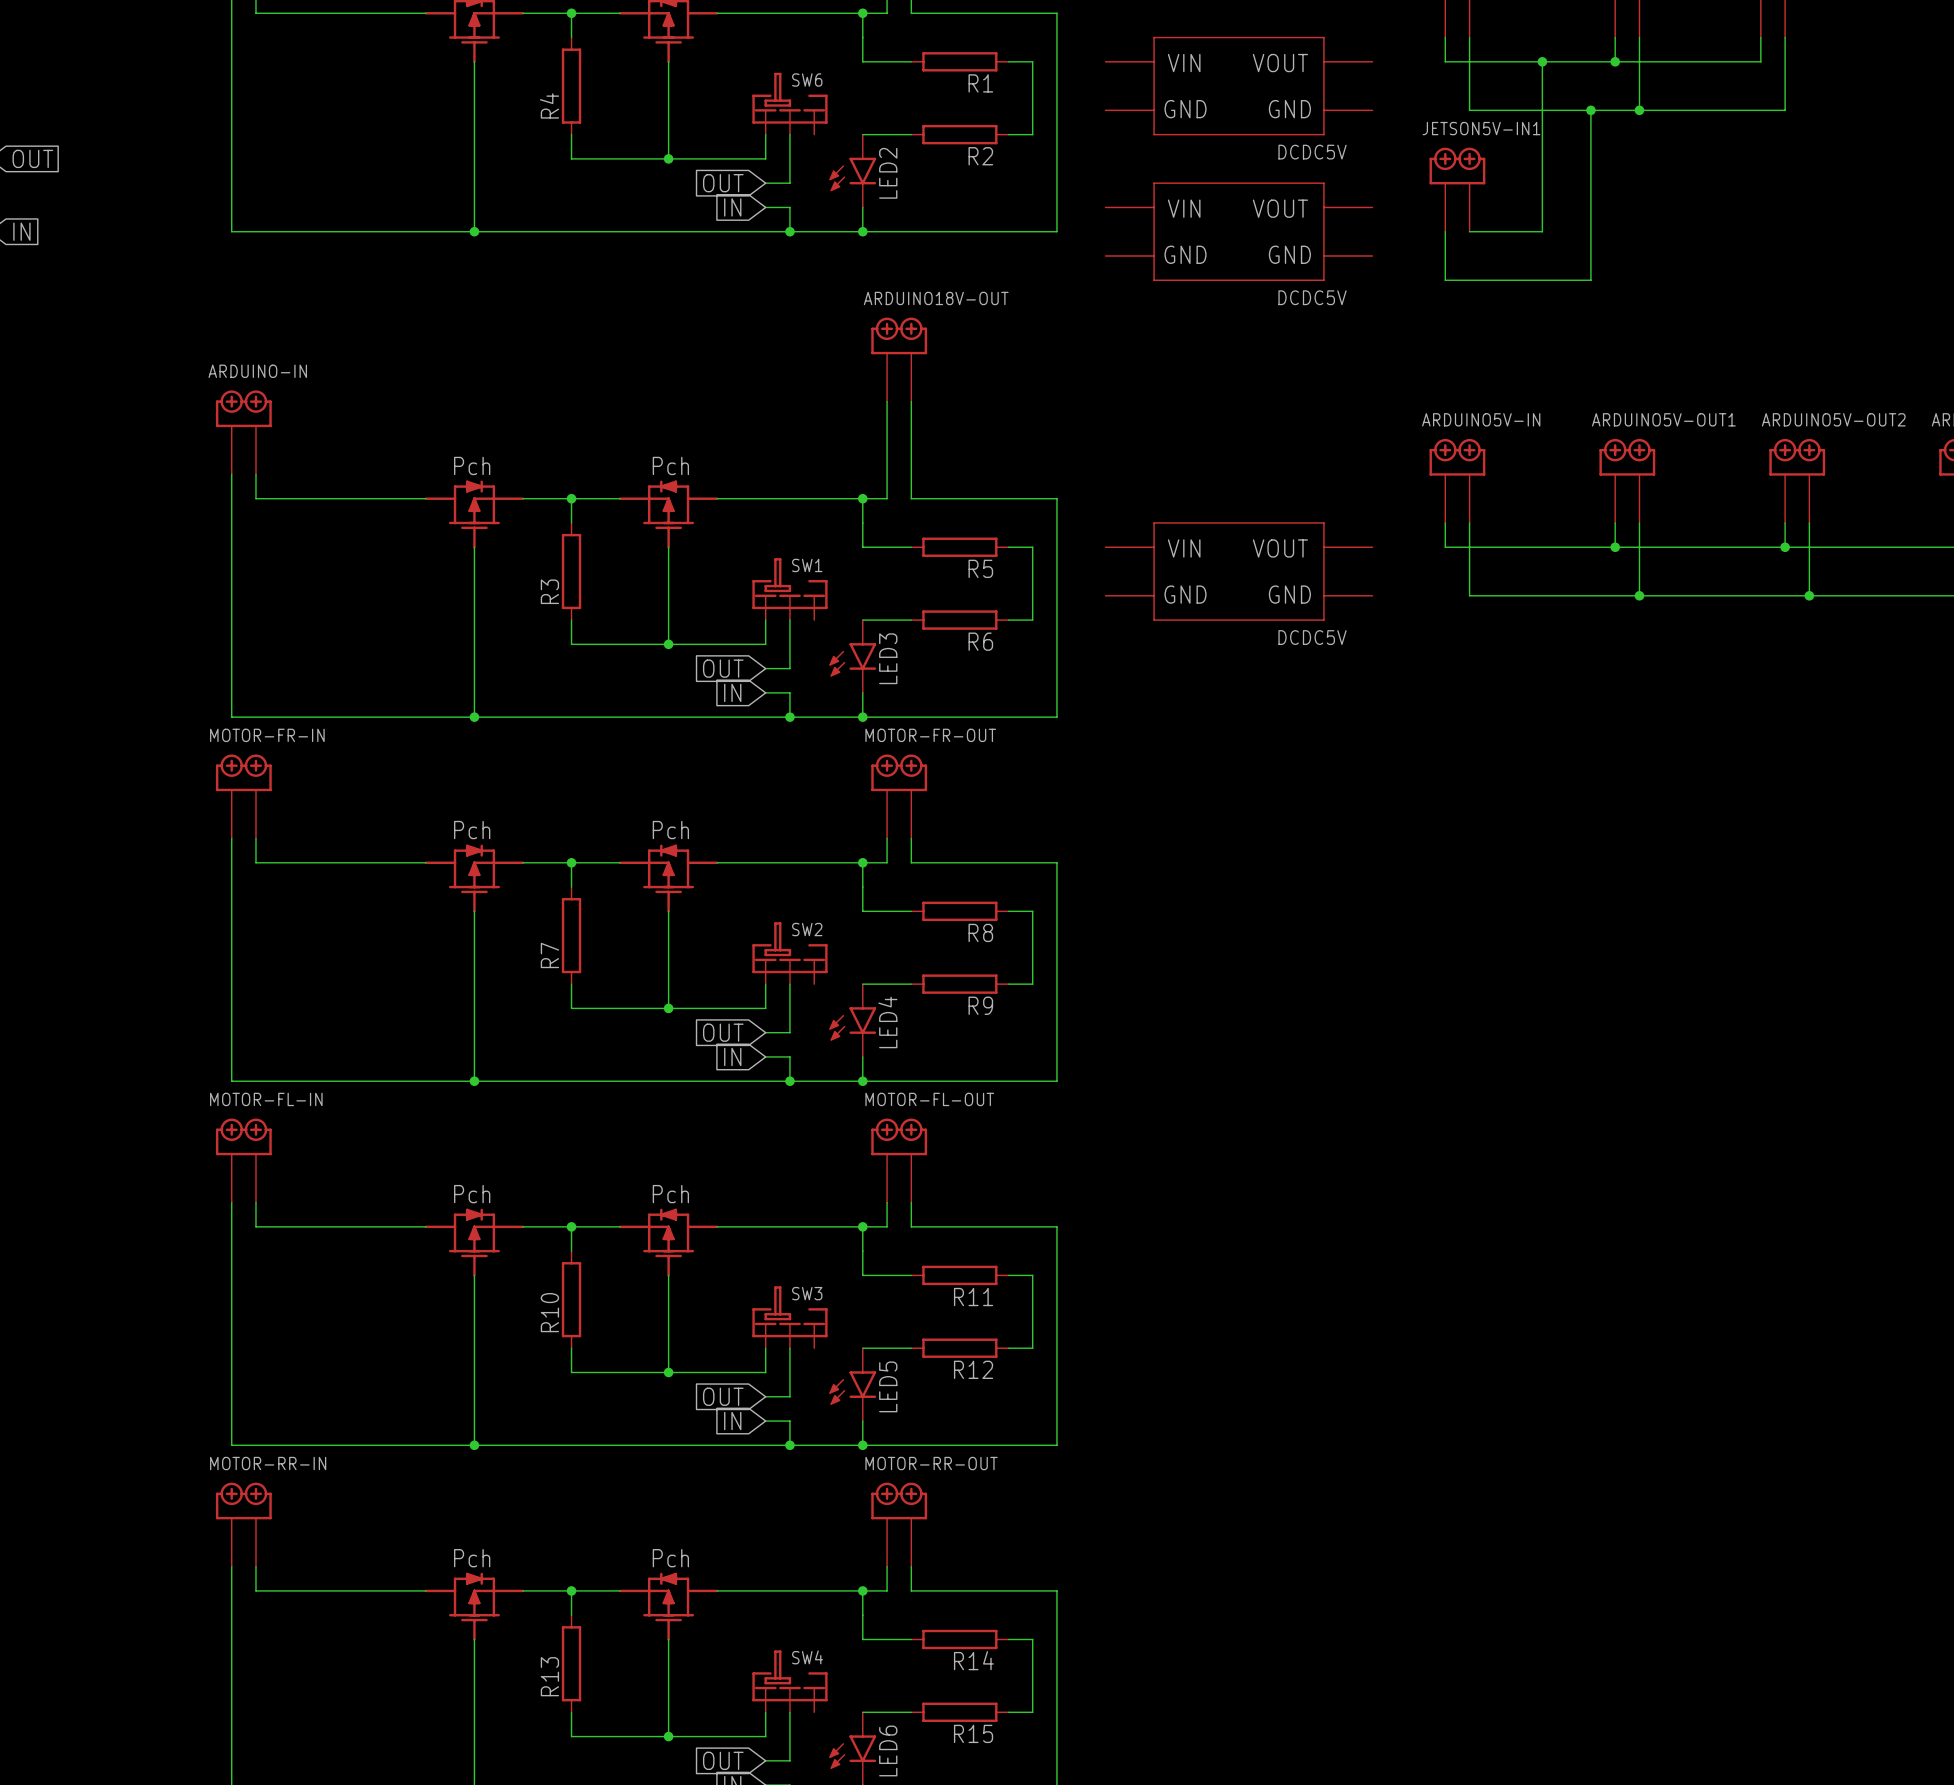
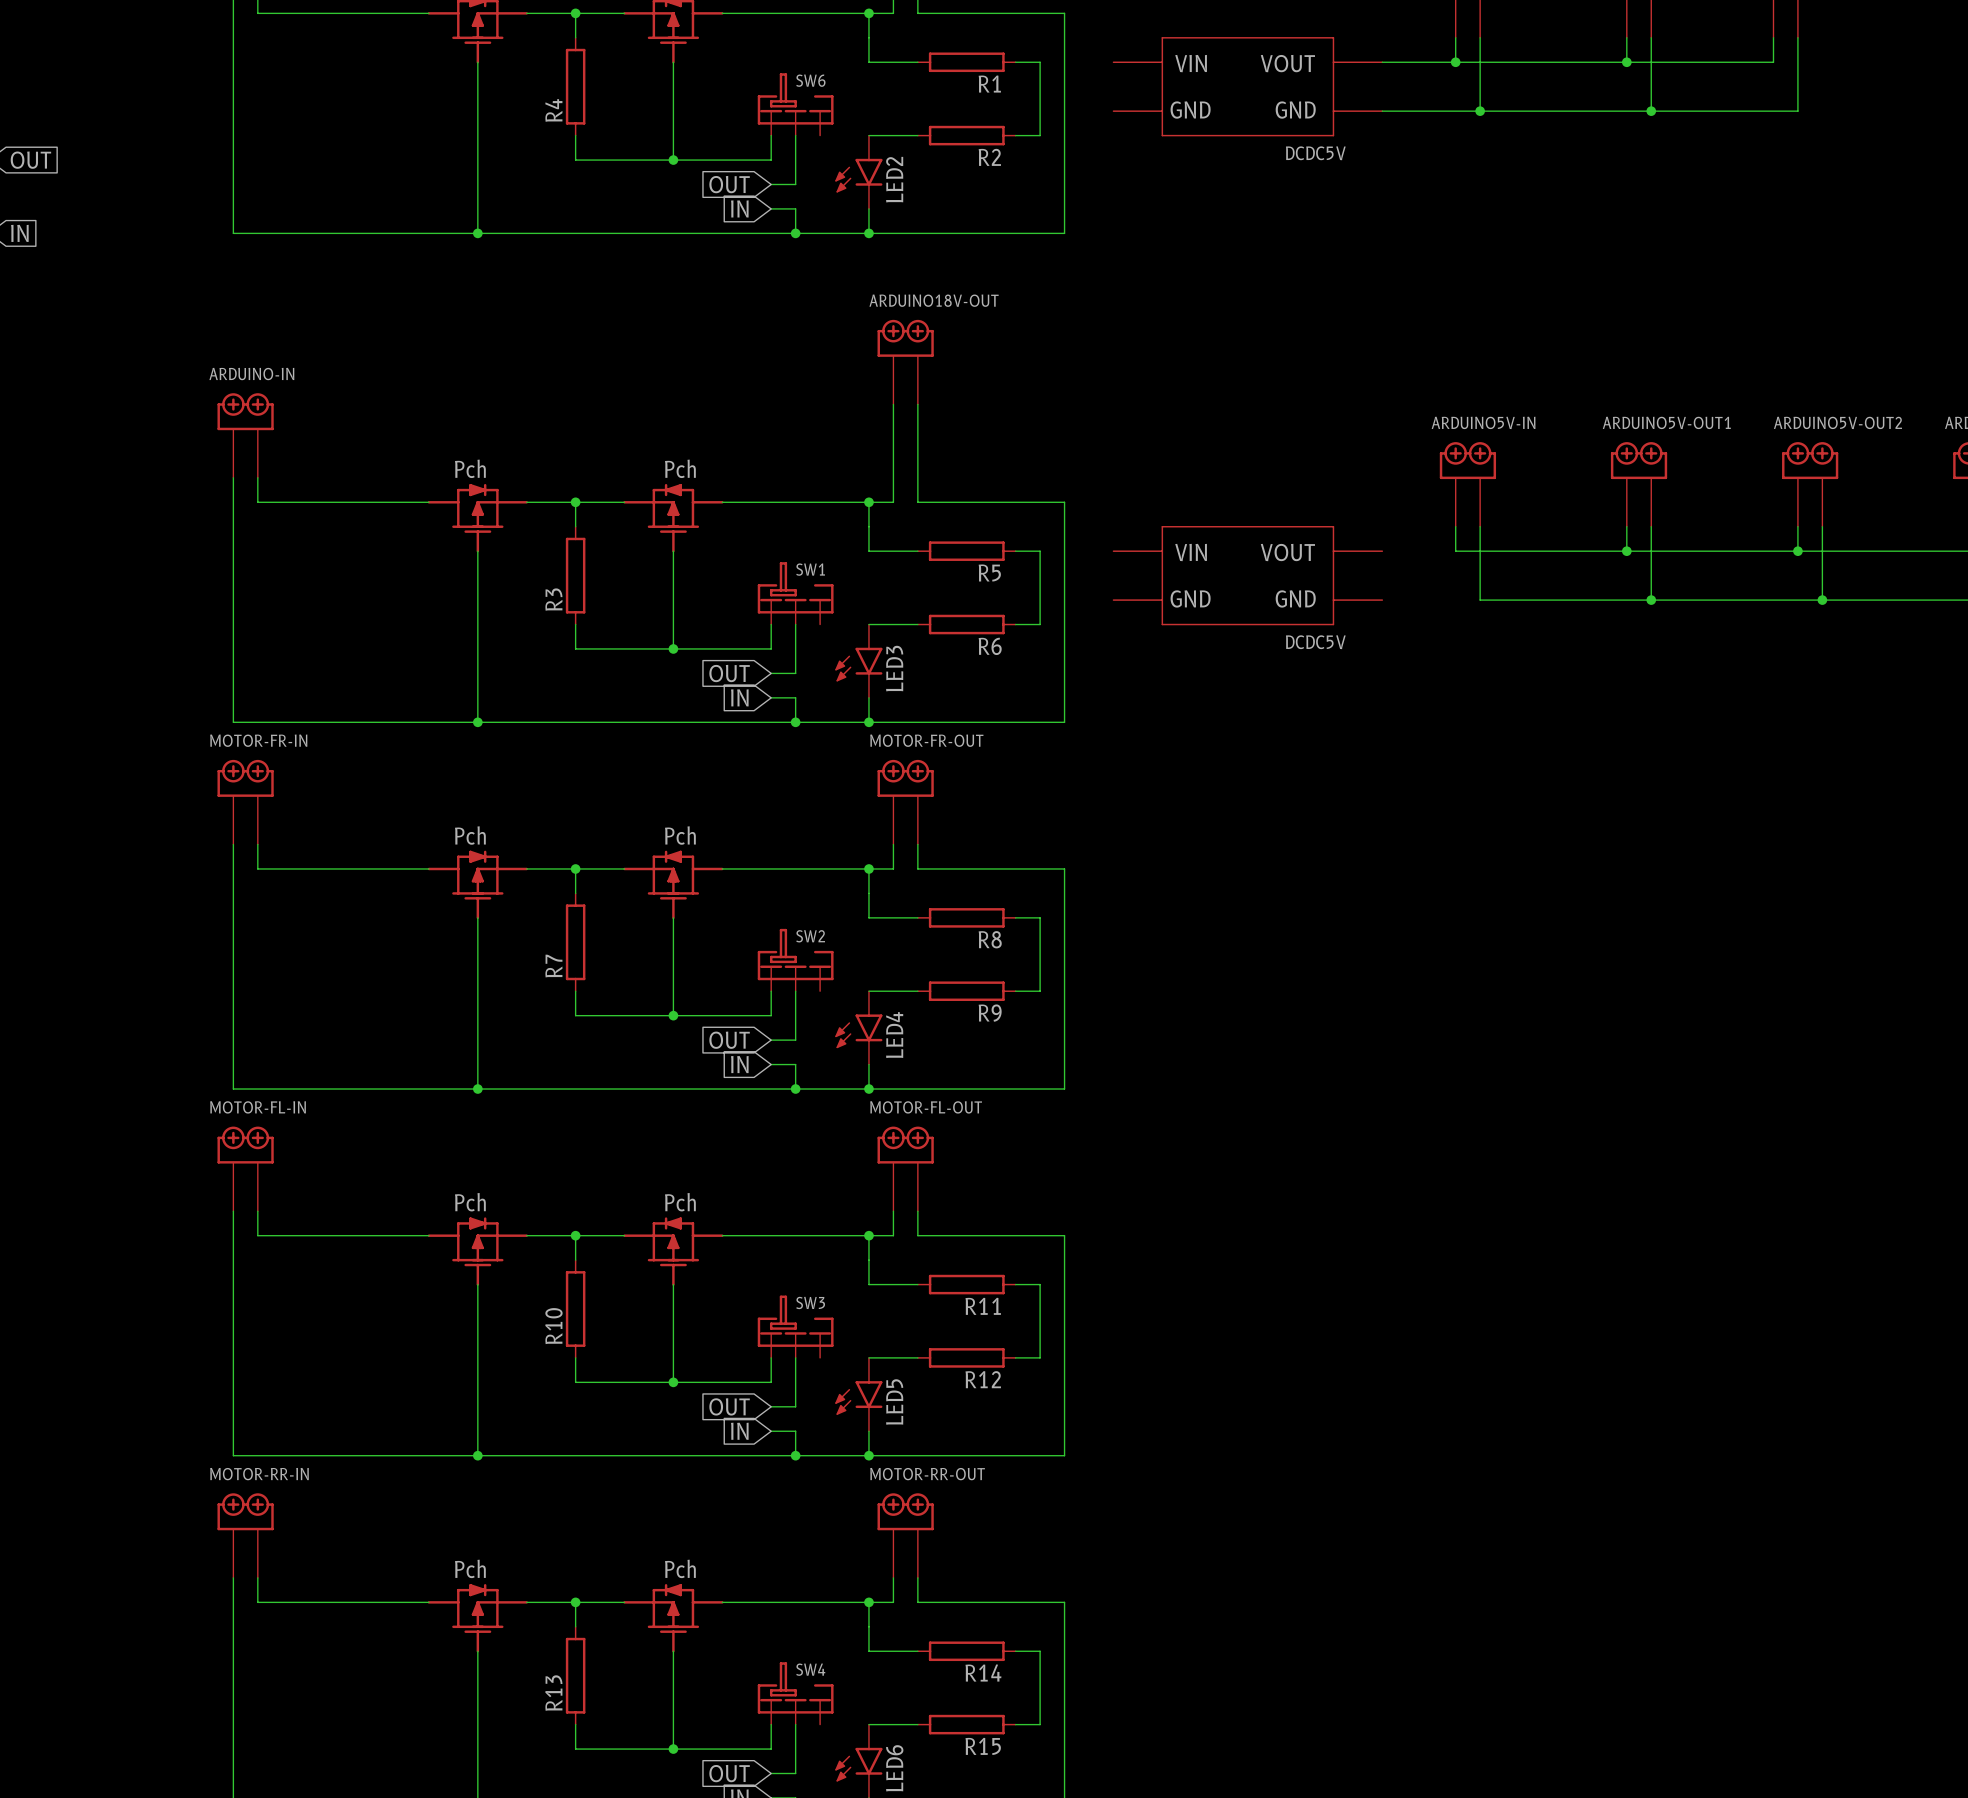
wire: none -> (1382, 62) (1455, 62)
junction: none -> (1455, 62)
wire: (1542, 61) (1542, 231) (1469, 231) -> none
junction: (1542, 61) -> none
wire: none -> (1382, 111) (1480, 111)
junction: none -> (1480, 111)
wire: (1590, 110) (1590, 280) (1445, 280) (1445, 231) -> none
junction: (1590, 110) -> none
JETSON5V-IN1: (1457, 189) -> none
part: (1238, 231) -> none

